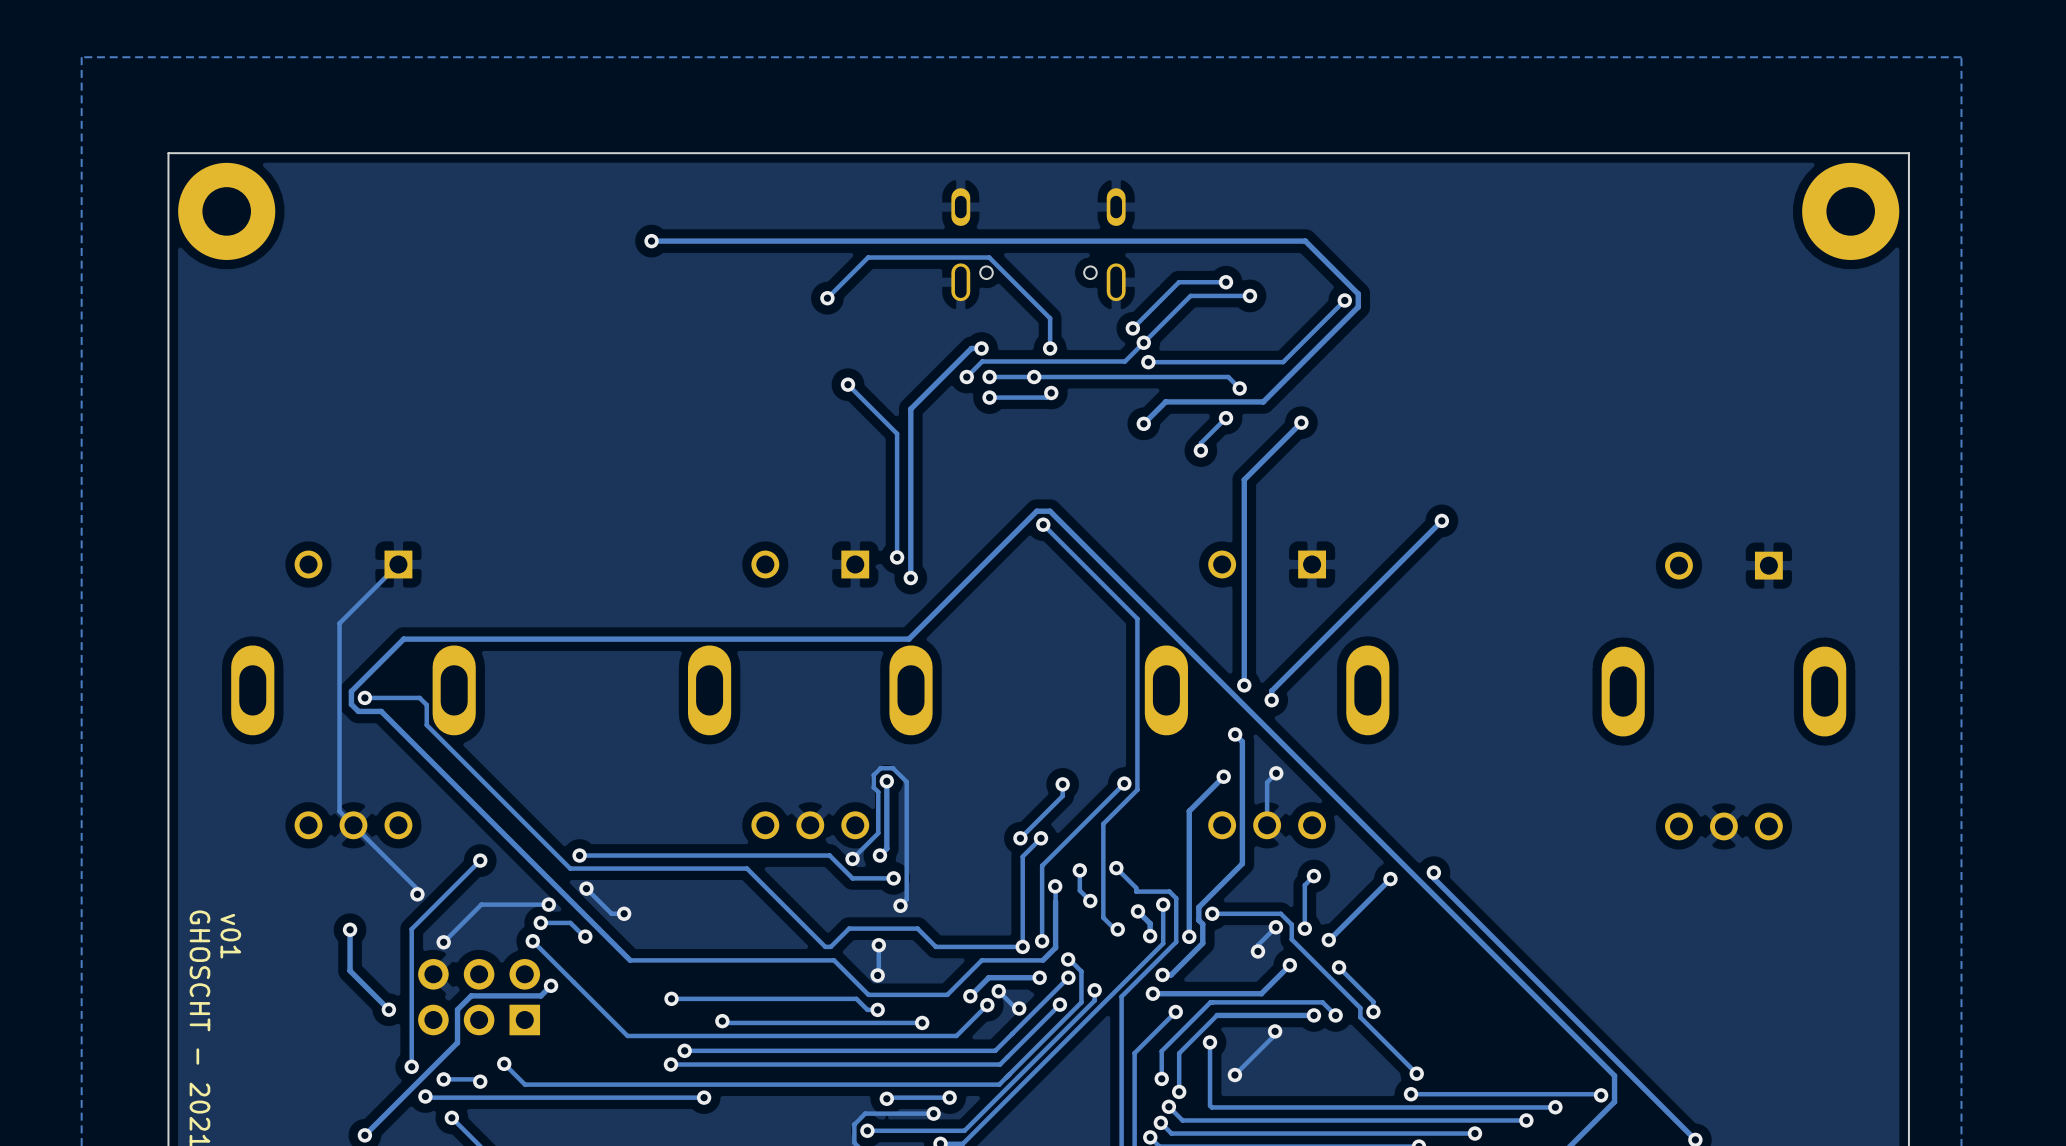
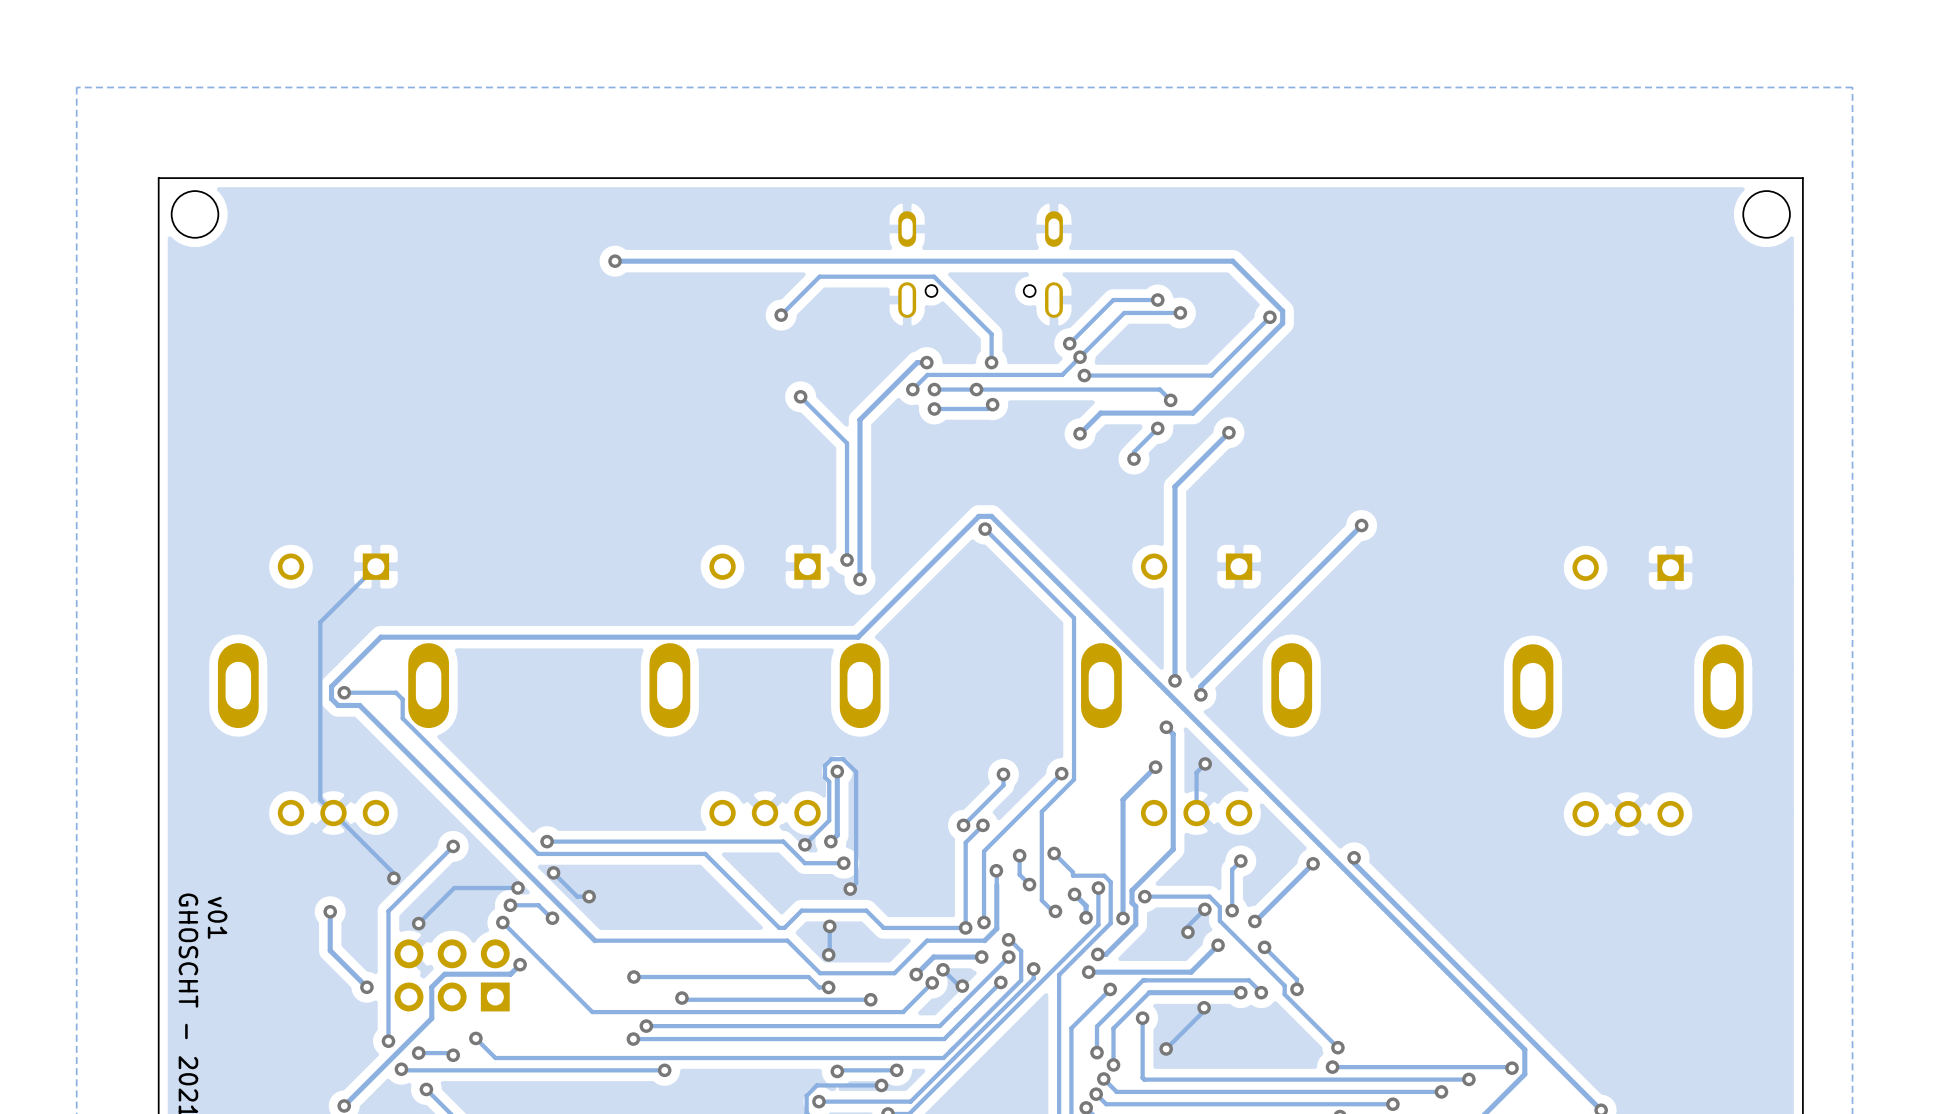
round board edge: none -> [171, 190, 219, 239]
round board edge: none -> [1742, 190, 1791, 239]
part: (226, 211) -> none
part: (1850, 211) -> none

